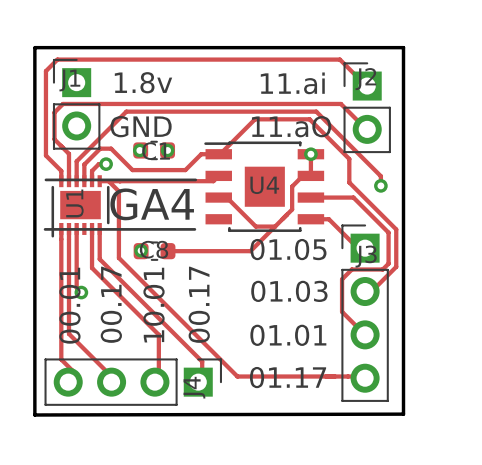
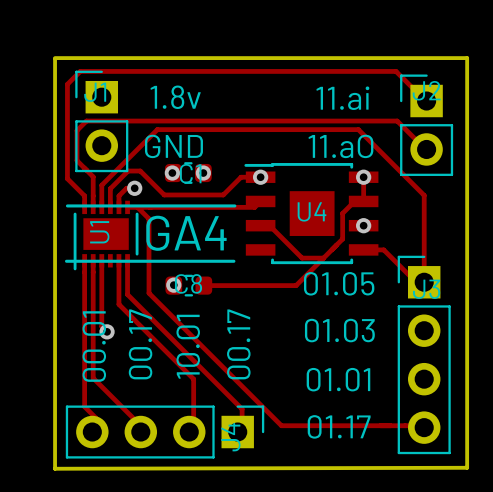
track: (306, 111) (316, 111) (380, 176) (380, 185) -> (358, 129) (424, 195) (424, 282)
track: (218, 154) (255, 119) (309, 119) (349, 159) (349, 182) (396, 229) (396, 266) (373, 289) (368, 289) -> none
via: none -> (260, 177)
via position: (380, 185) -> (363, 225)
track: (310, 197) (353, 197) (388, 232) (388, 263) (382, 269) (351, 269) (342, 279) (342, 311) (365, 334) -> none

